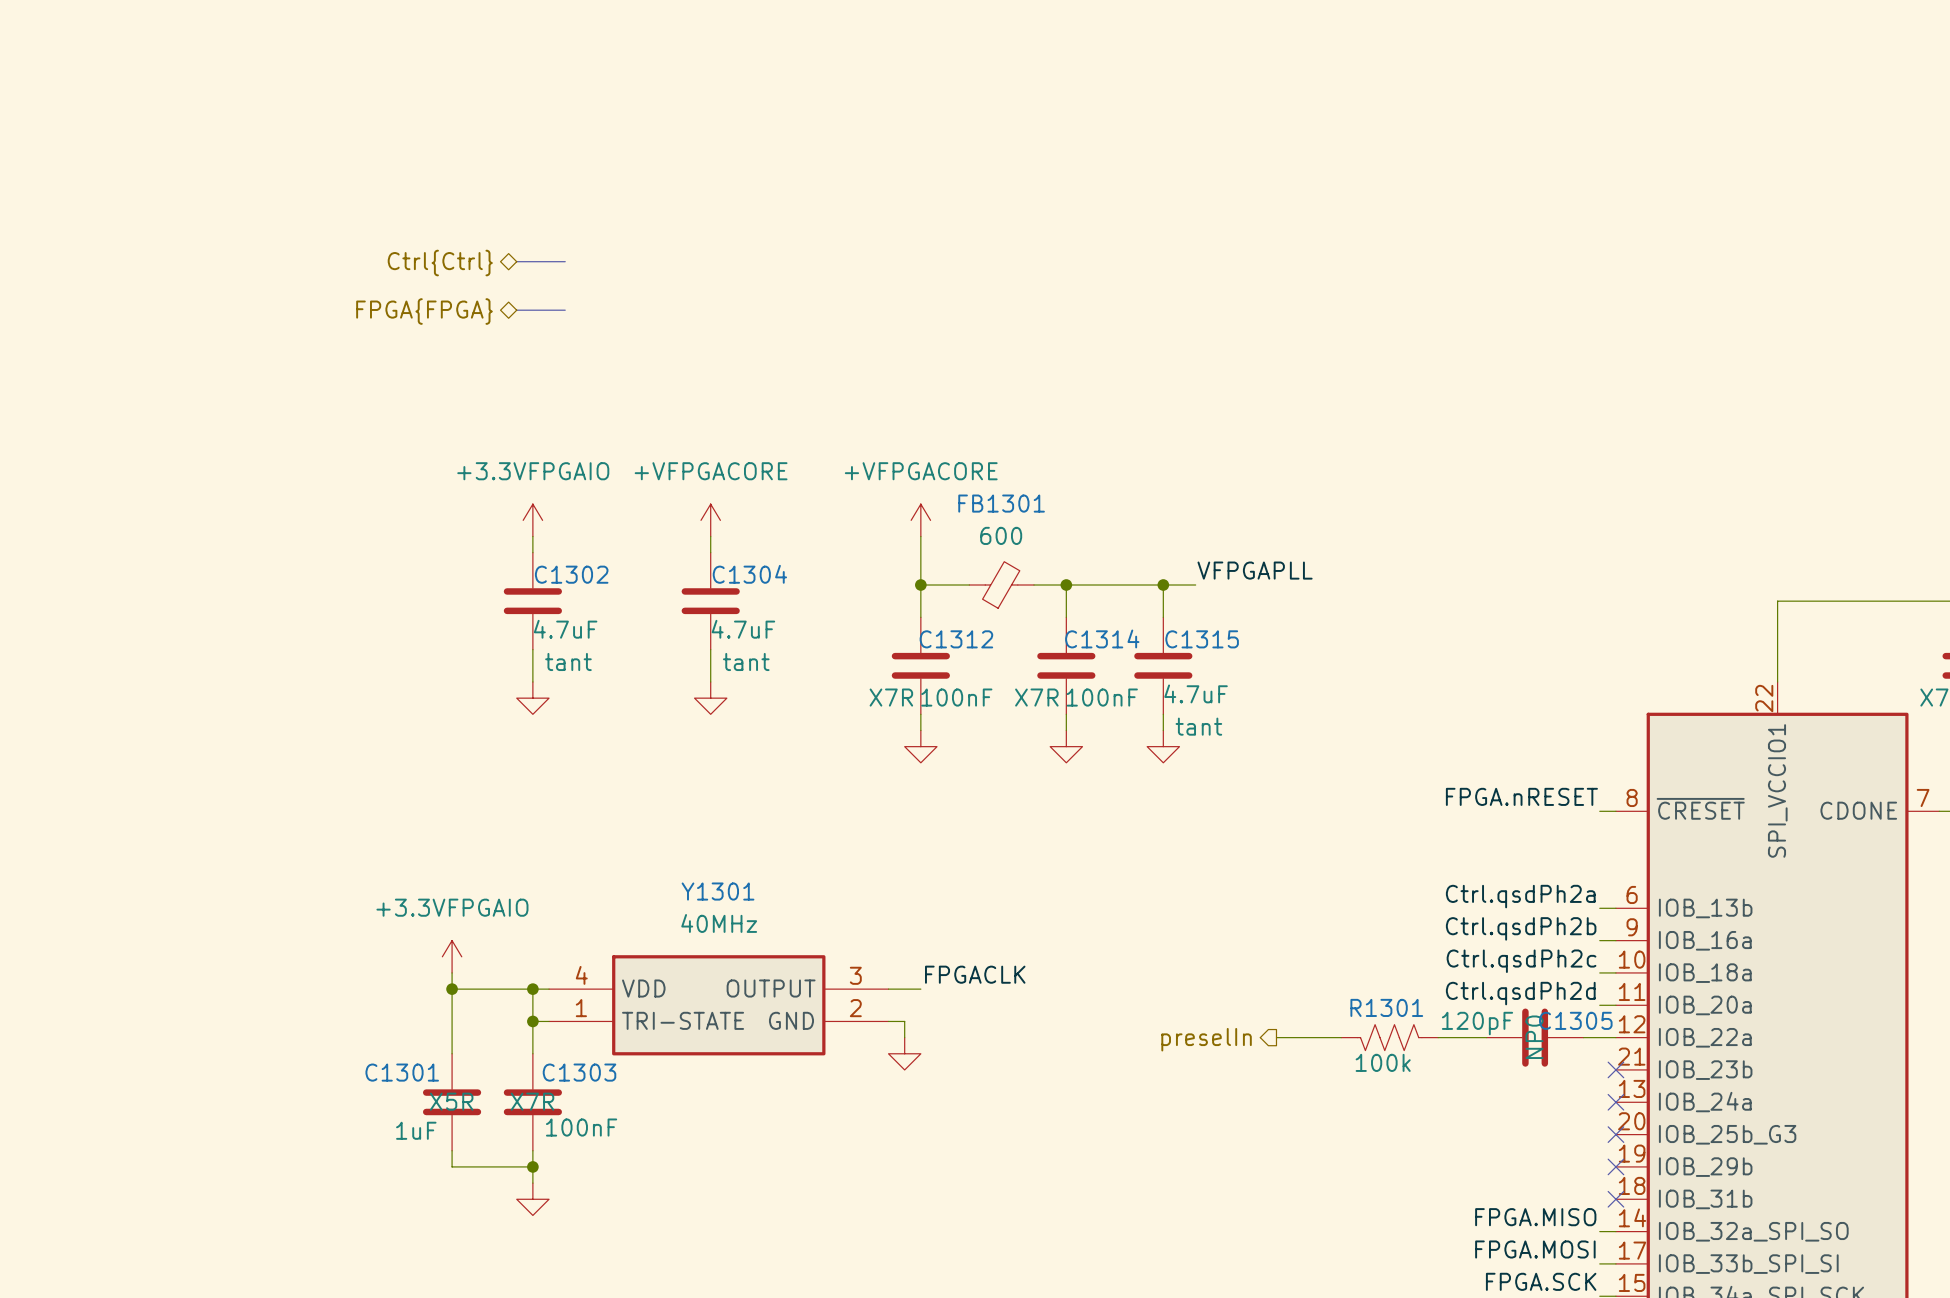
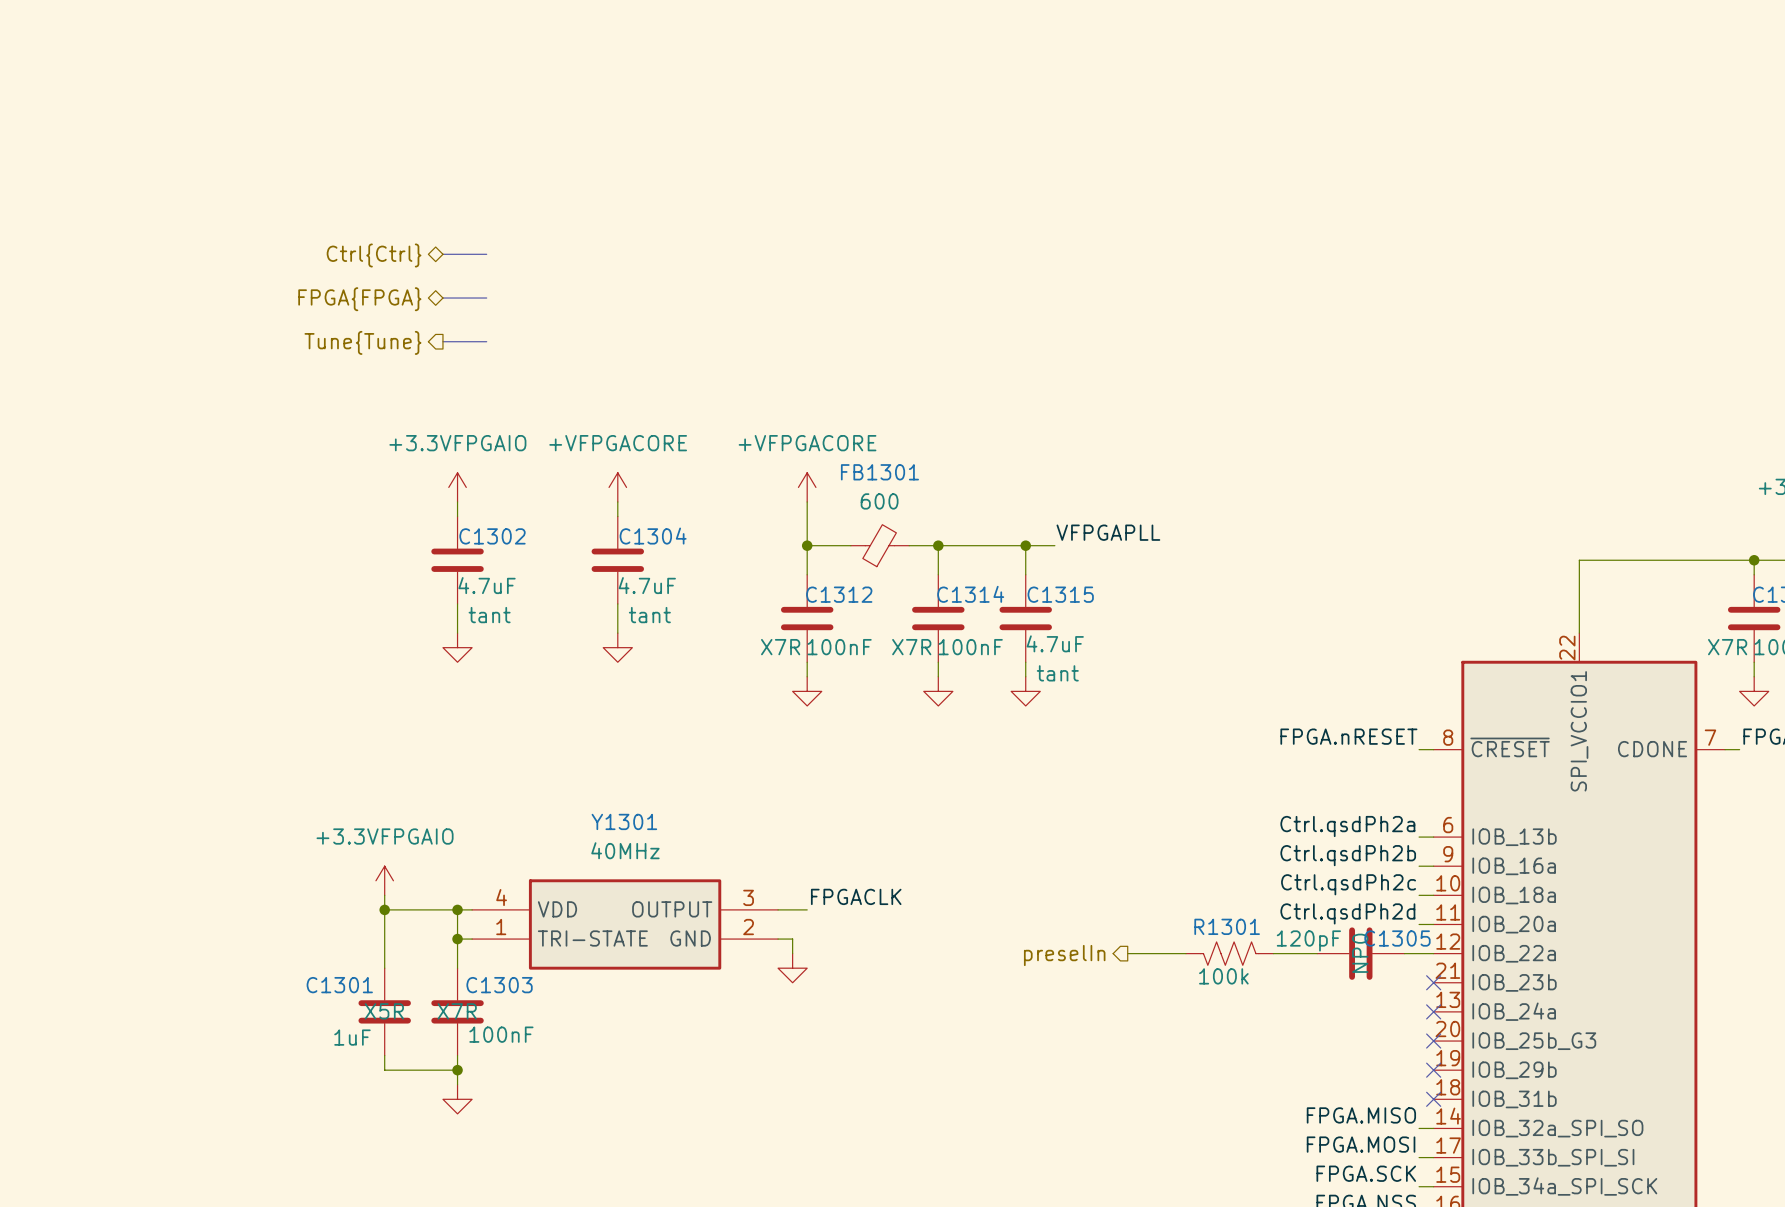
bus: none -> (442, 341) (486, 341)
hierarchical label: none -> Tune{Tune} (362, 342)

